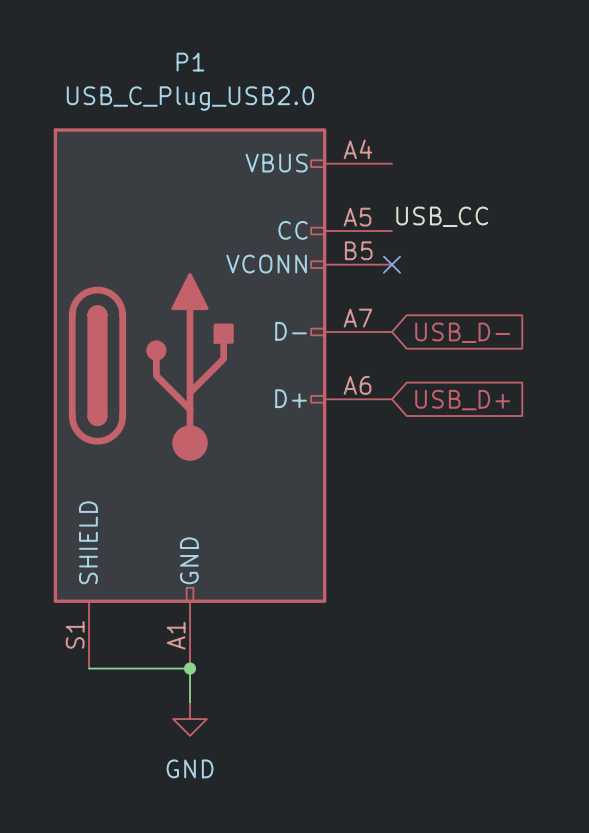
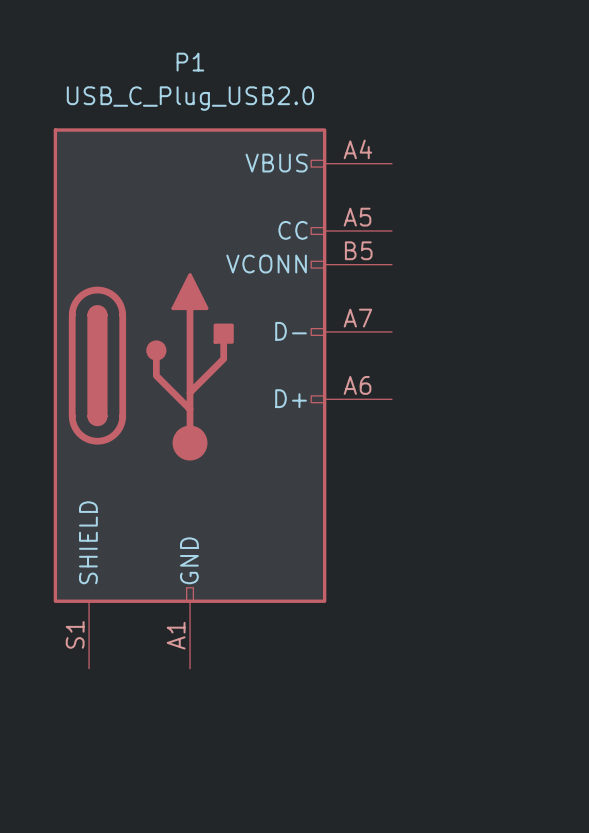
label: USB_CC (442, 216) -> none
no-connect mark: (391, 264) -> none
global label: USB_D- (462, 332) -> none
global label: USB_D+ (462, 400) -> none
wire: (89, 668) (190, 668) (190, 702) -> none
junction: (190, 668) -> none
power symbol: GND (190, 719) -> none

